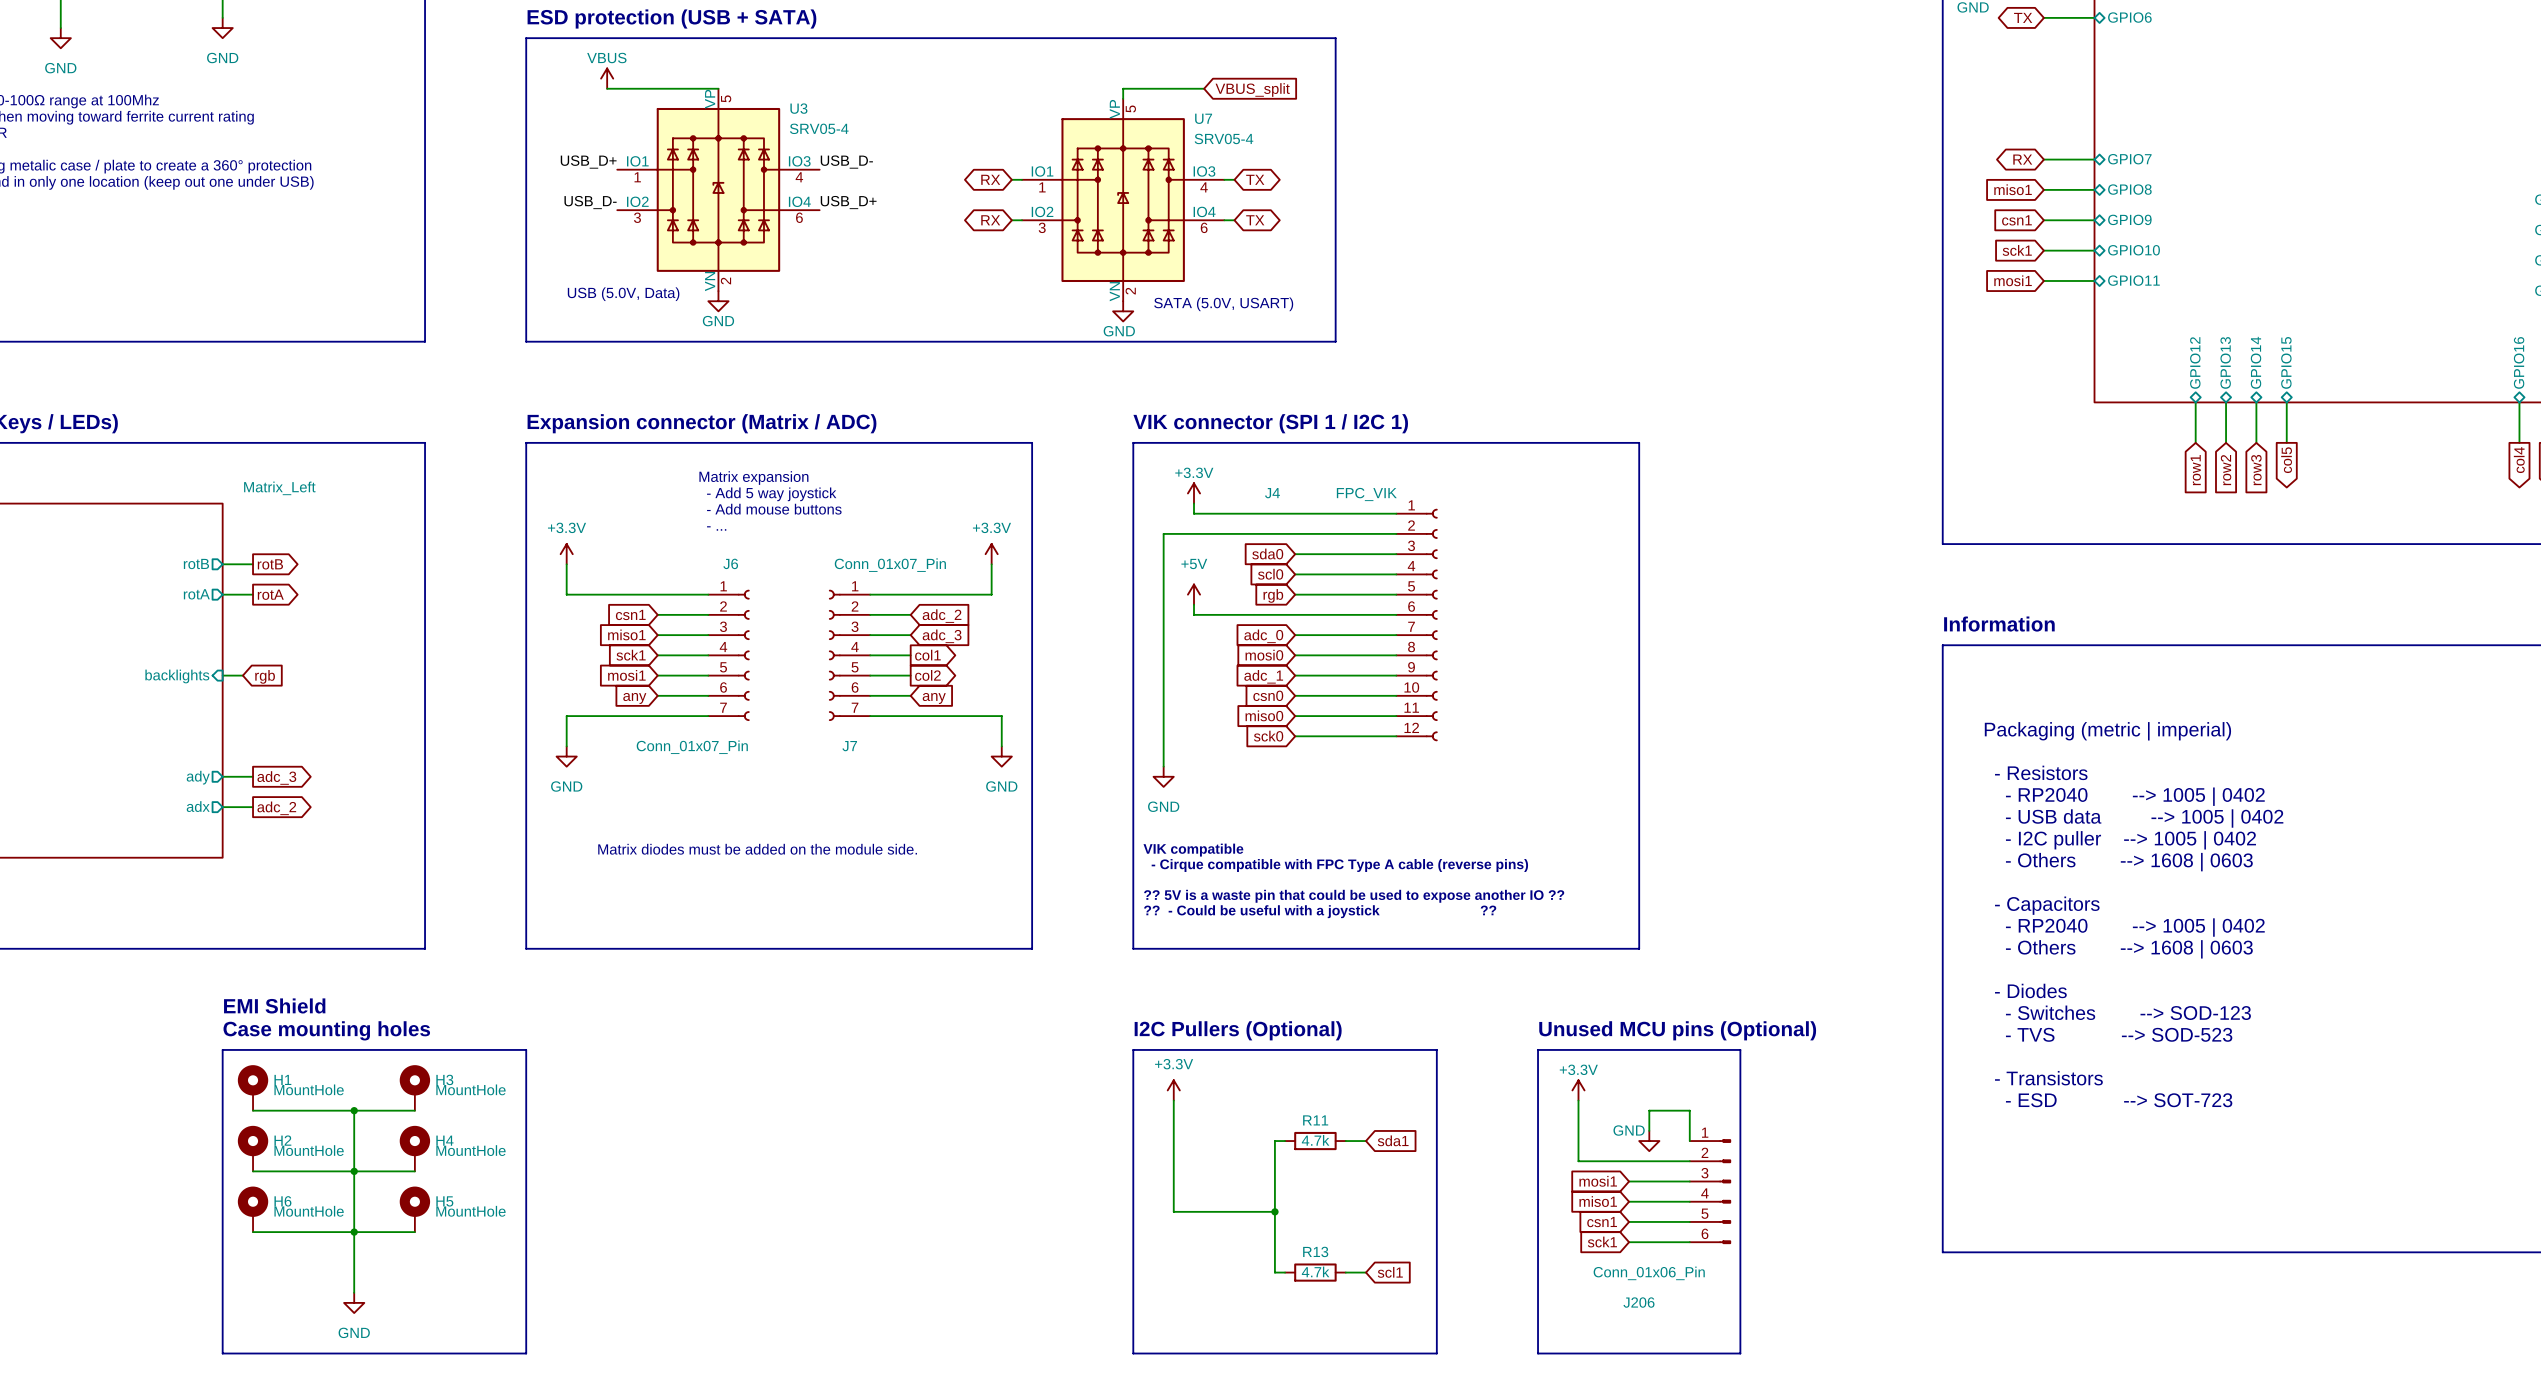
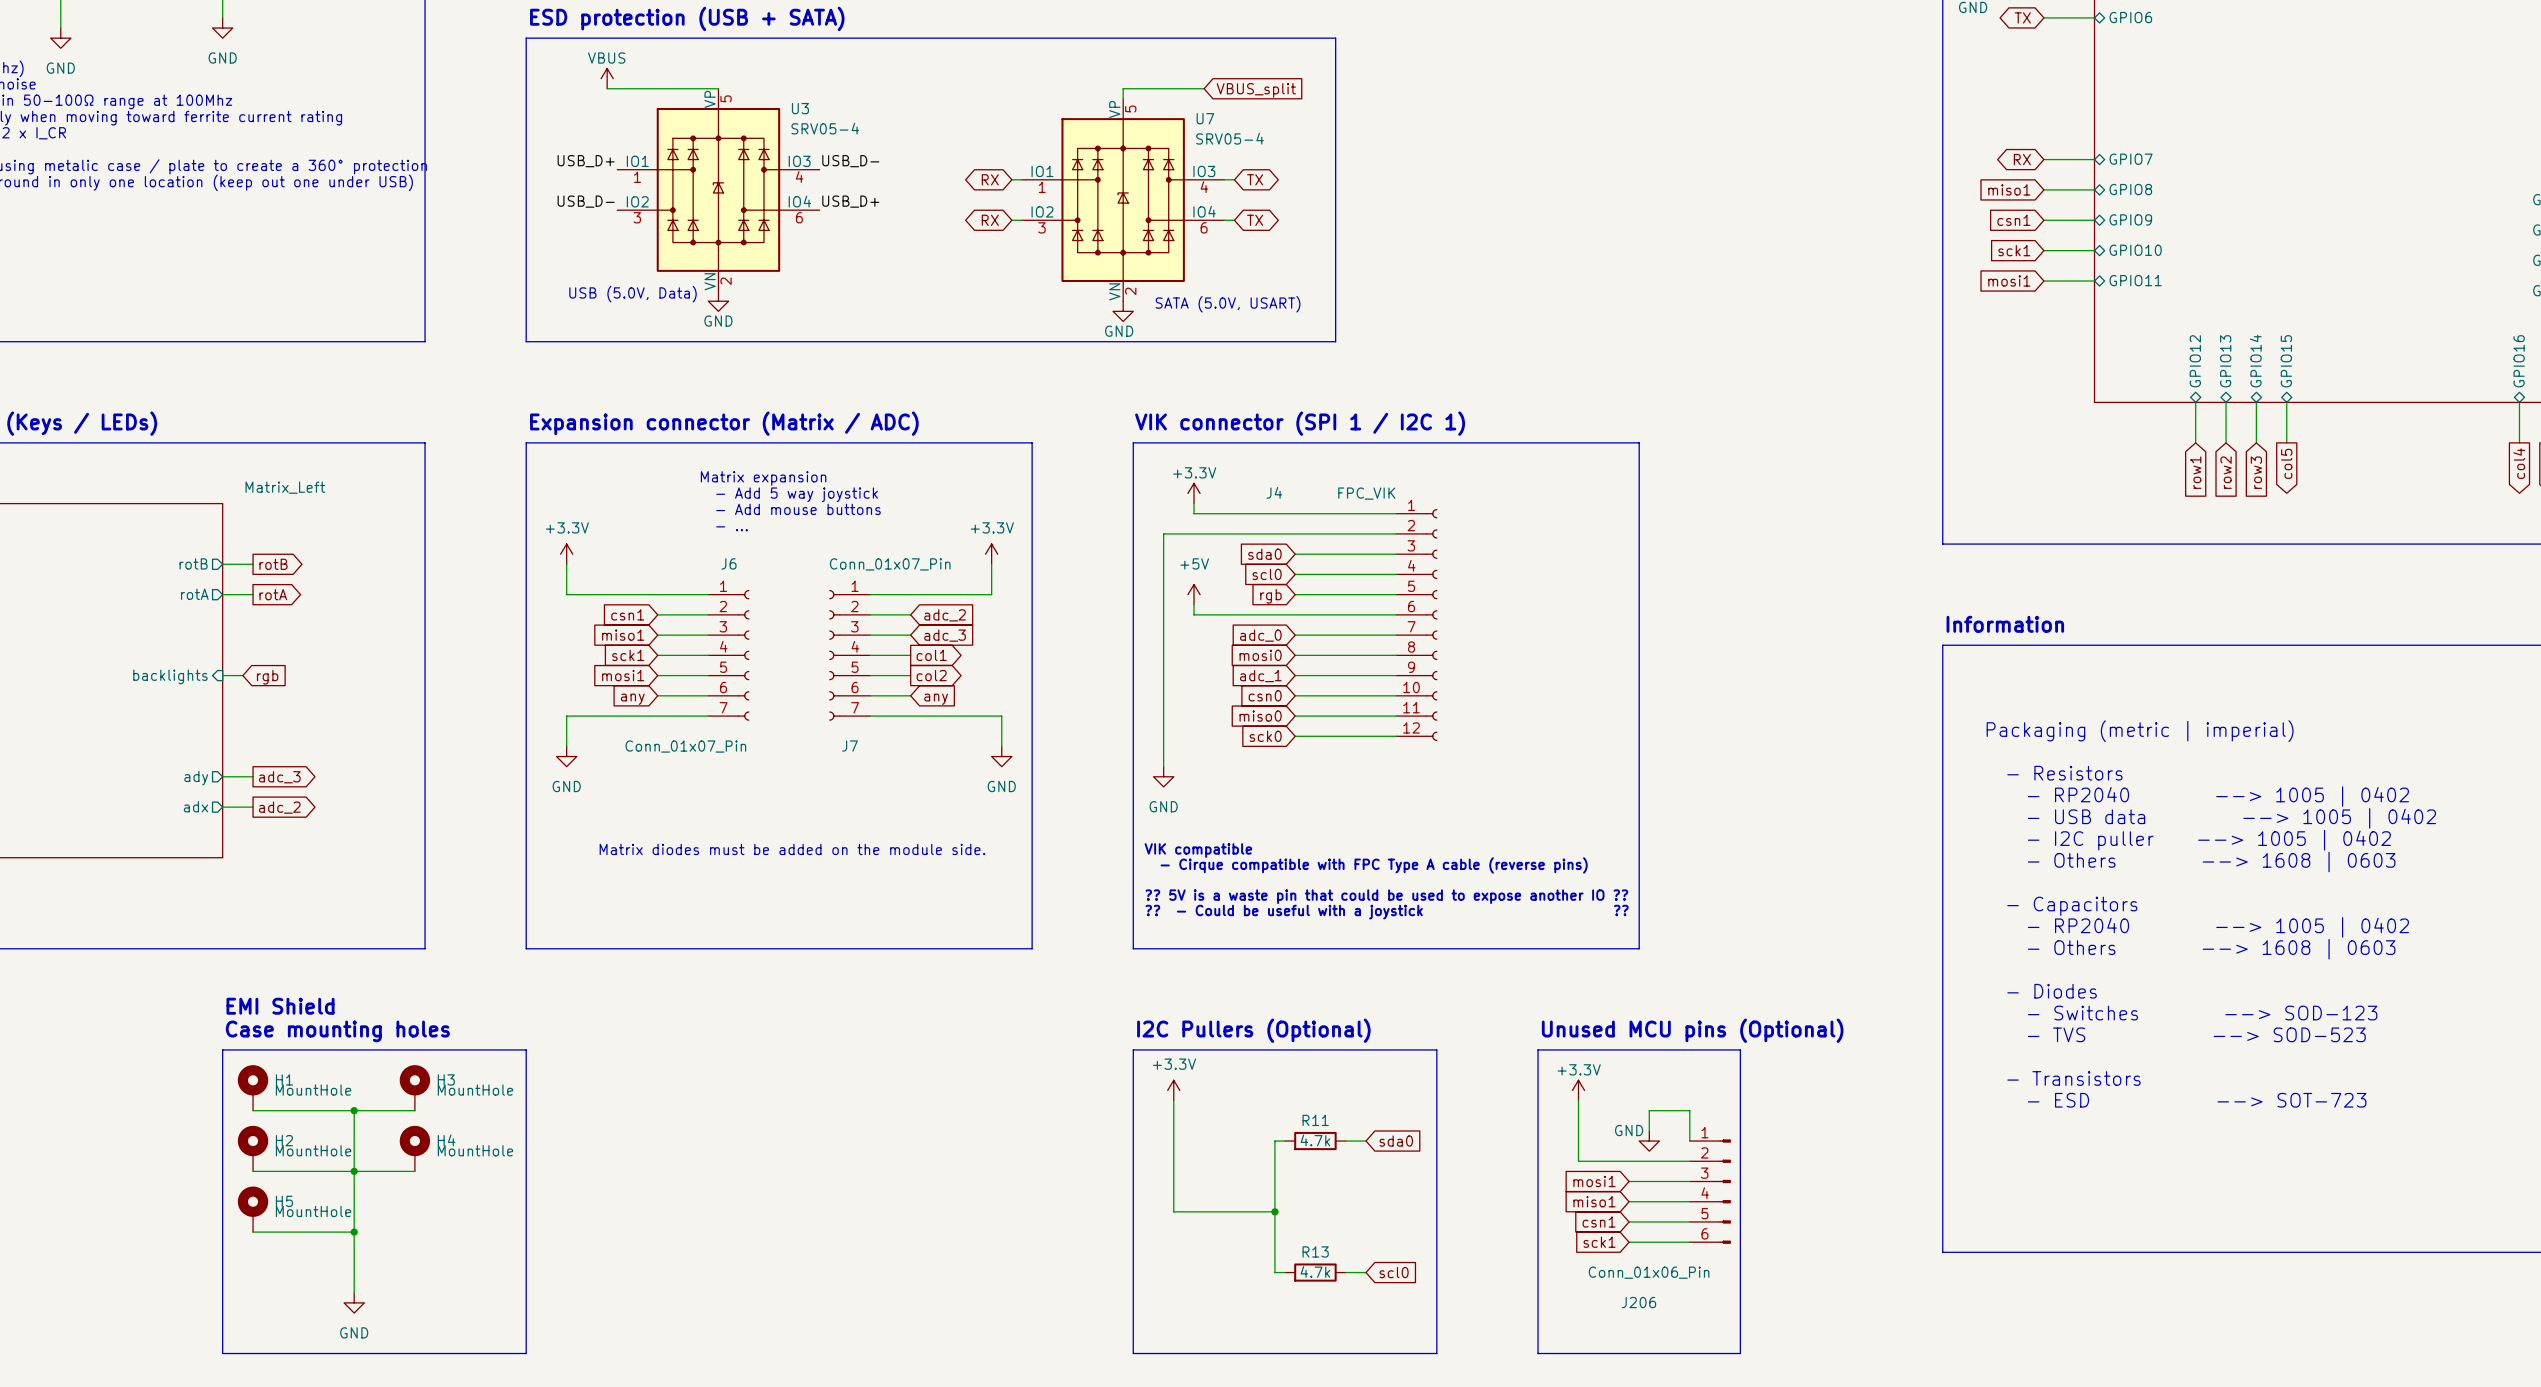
global label: sda1 (1393, 1140) -> sda0 (1396, 1141)
H6 name: H6 (282, 1201) -> H5 (284, 1201)
H5: MountHole (414, 1209) -> none
wire: (354, 1232) (414, 1232) -> none
global label: scl1 (1390, 1272) -> scl0 (1394, 1272)

